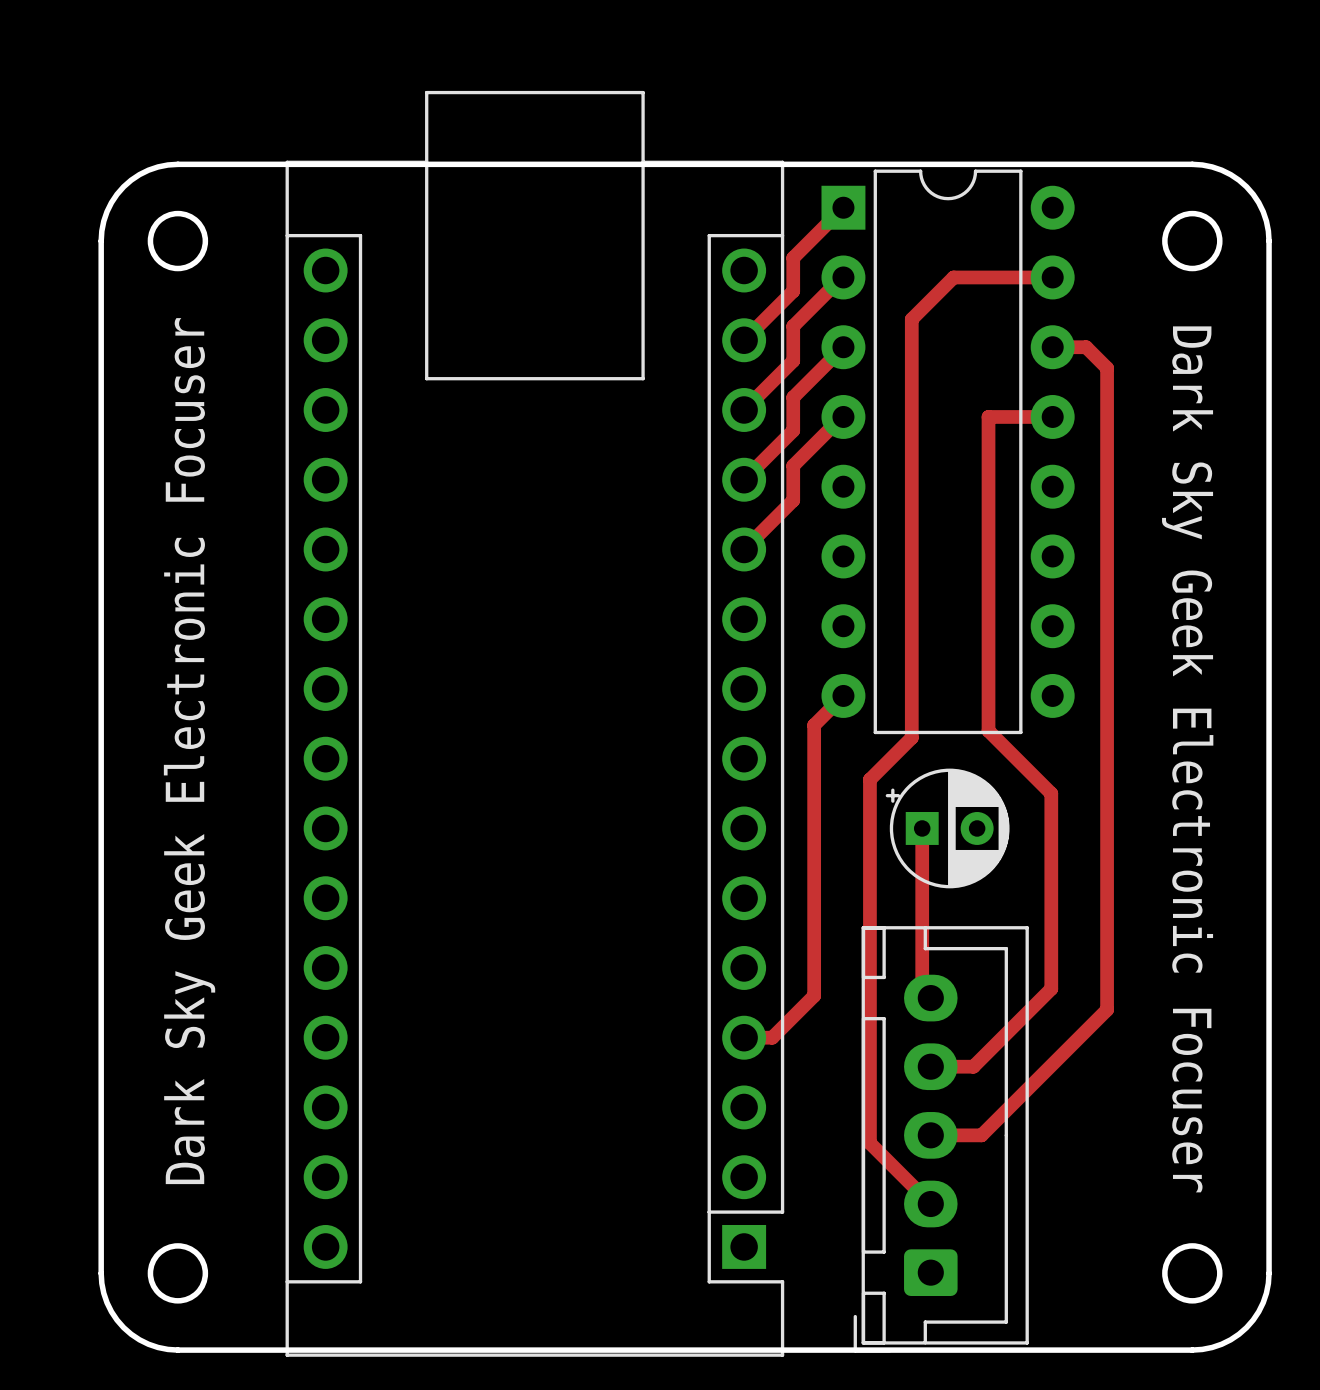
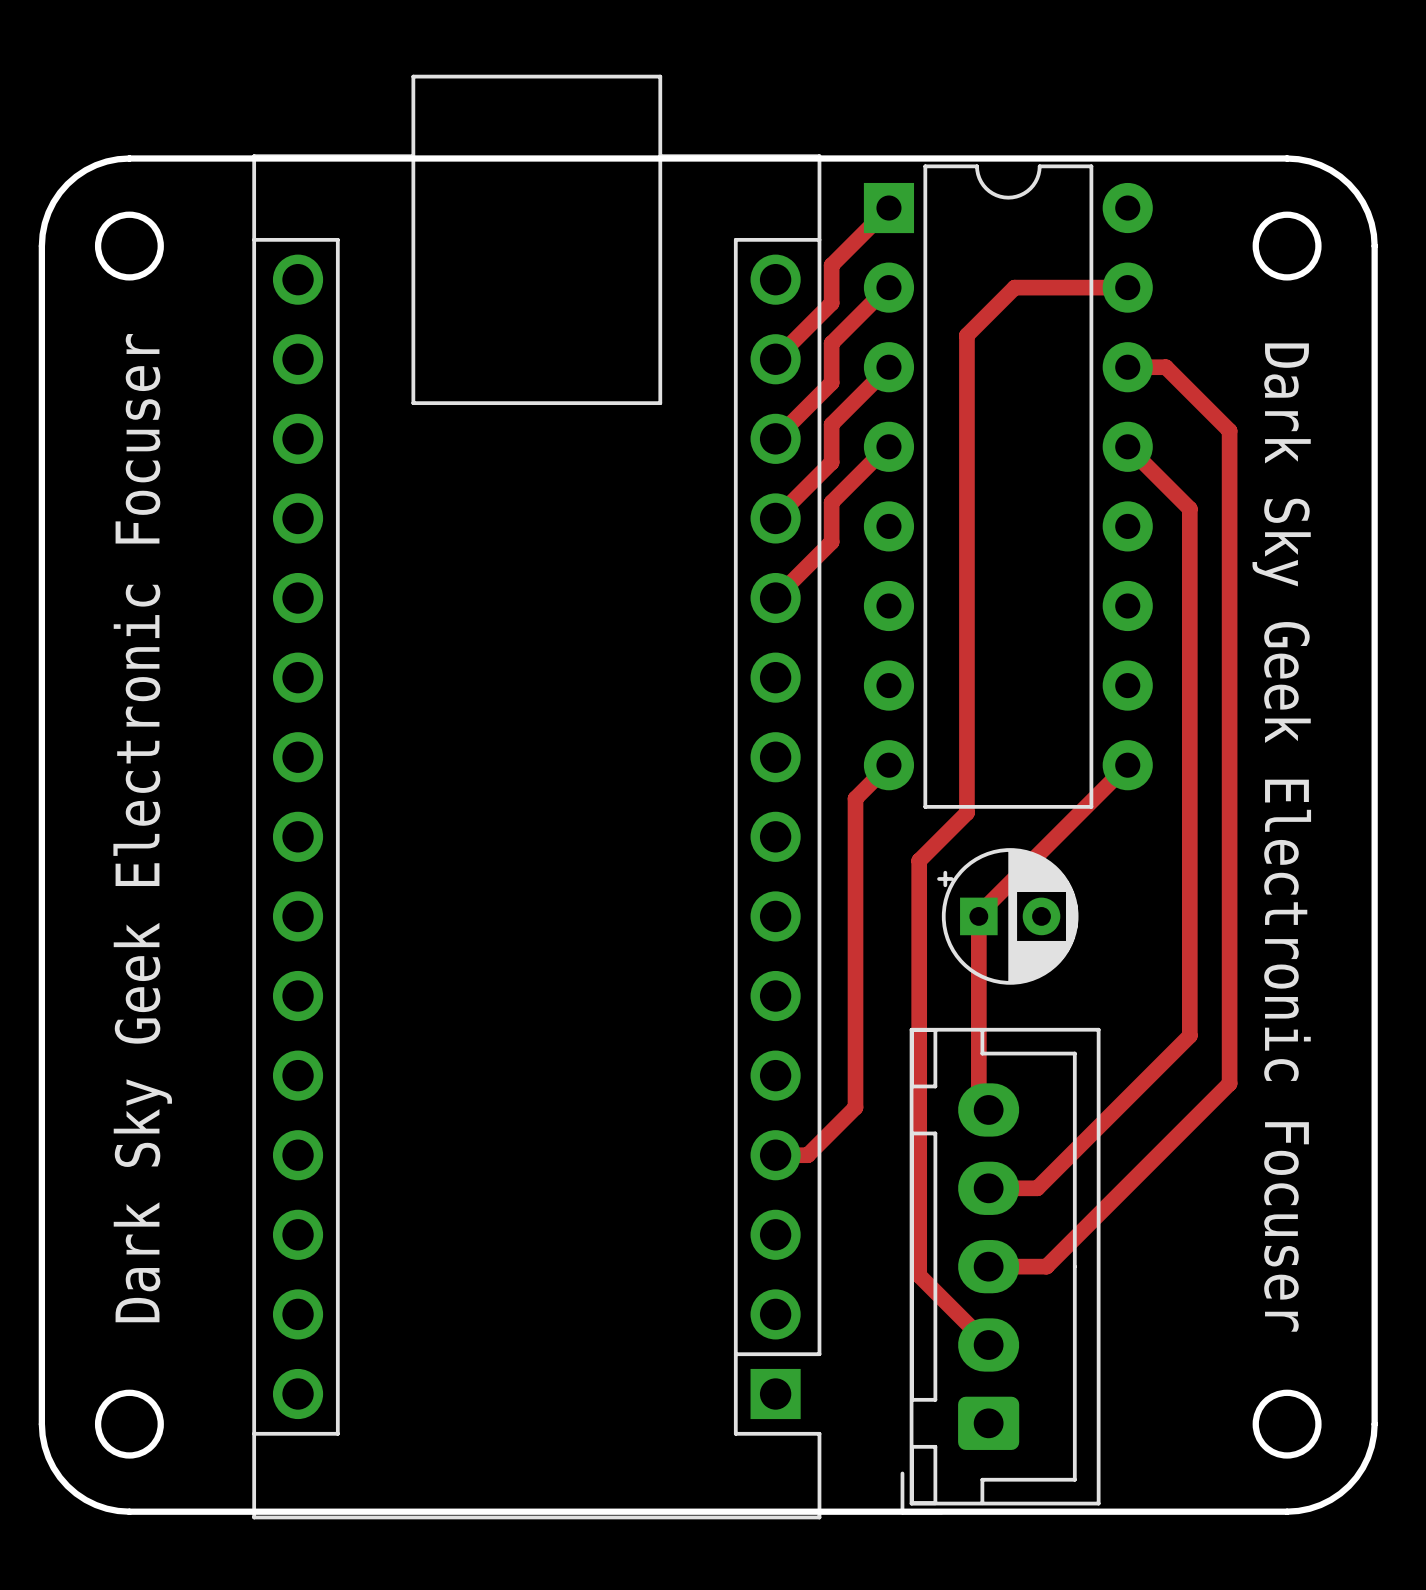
track: (1107, 368) (1107, 471) -> (1127, 446) (1189, 508)
track: none -> (1189, 391) (1229, 430) (1229, 1083) (1189, 1123)
track: (1052, 416) (988, 416) (988, 730) (1051, 793) (1051, 988) -> none
track: none -> (1127, 765) (978, 914) (978, 916)
track: (1107, 933) (1107, 1009) -> (1189, 1035) (1126, 1099)

